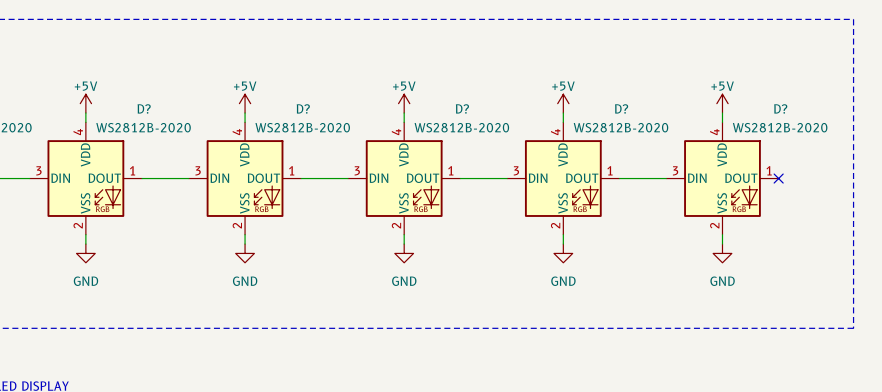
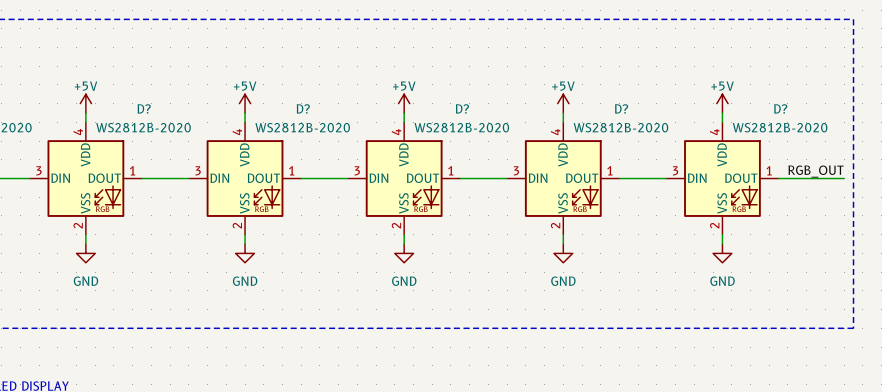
label: none -> RGB_OUT (816, 171)
wire: none -> (778, 178) (844, 178)
no-connect mark: (778, 178) -> none

